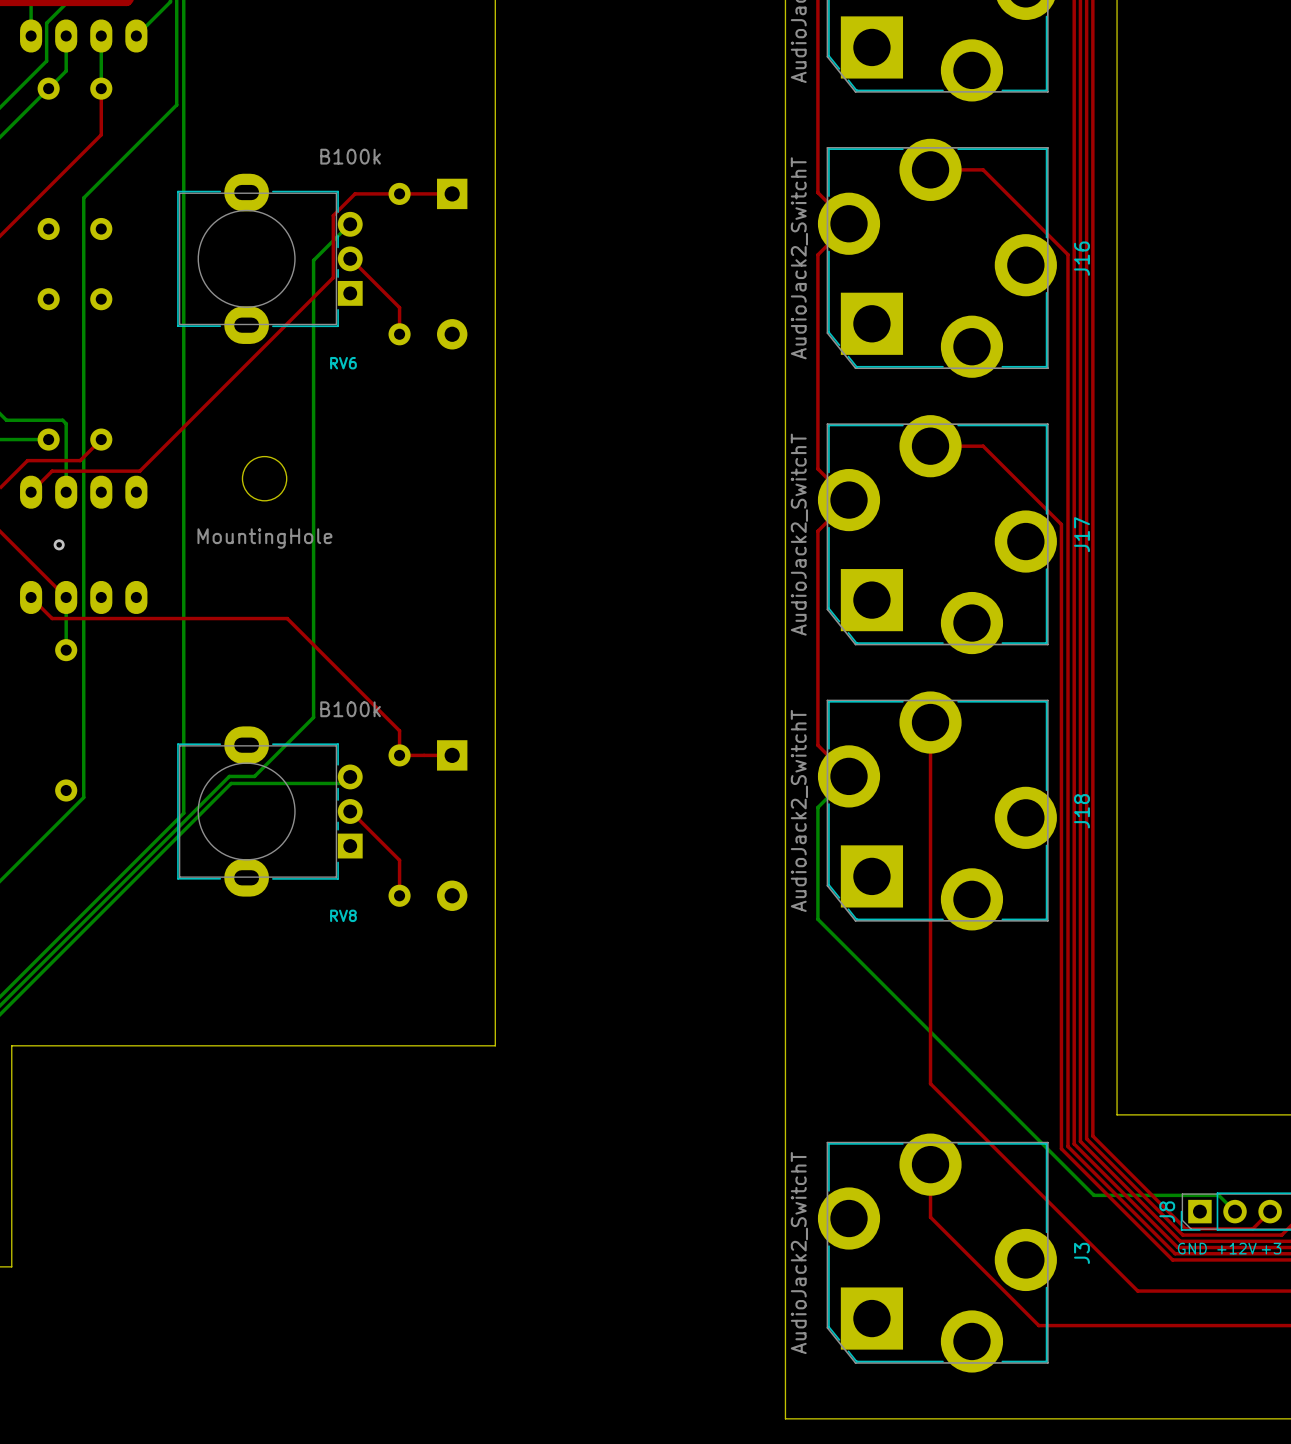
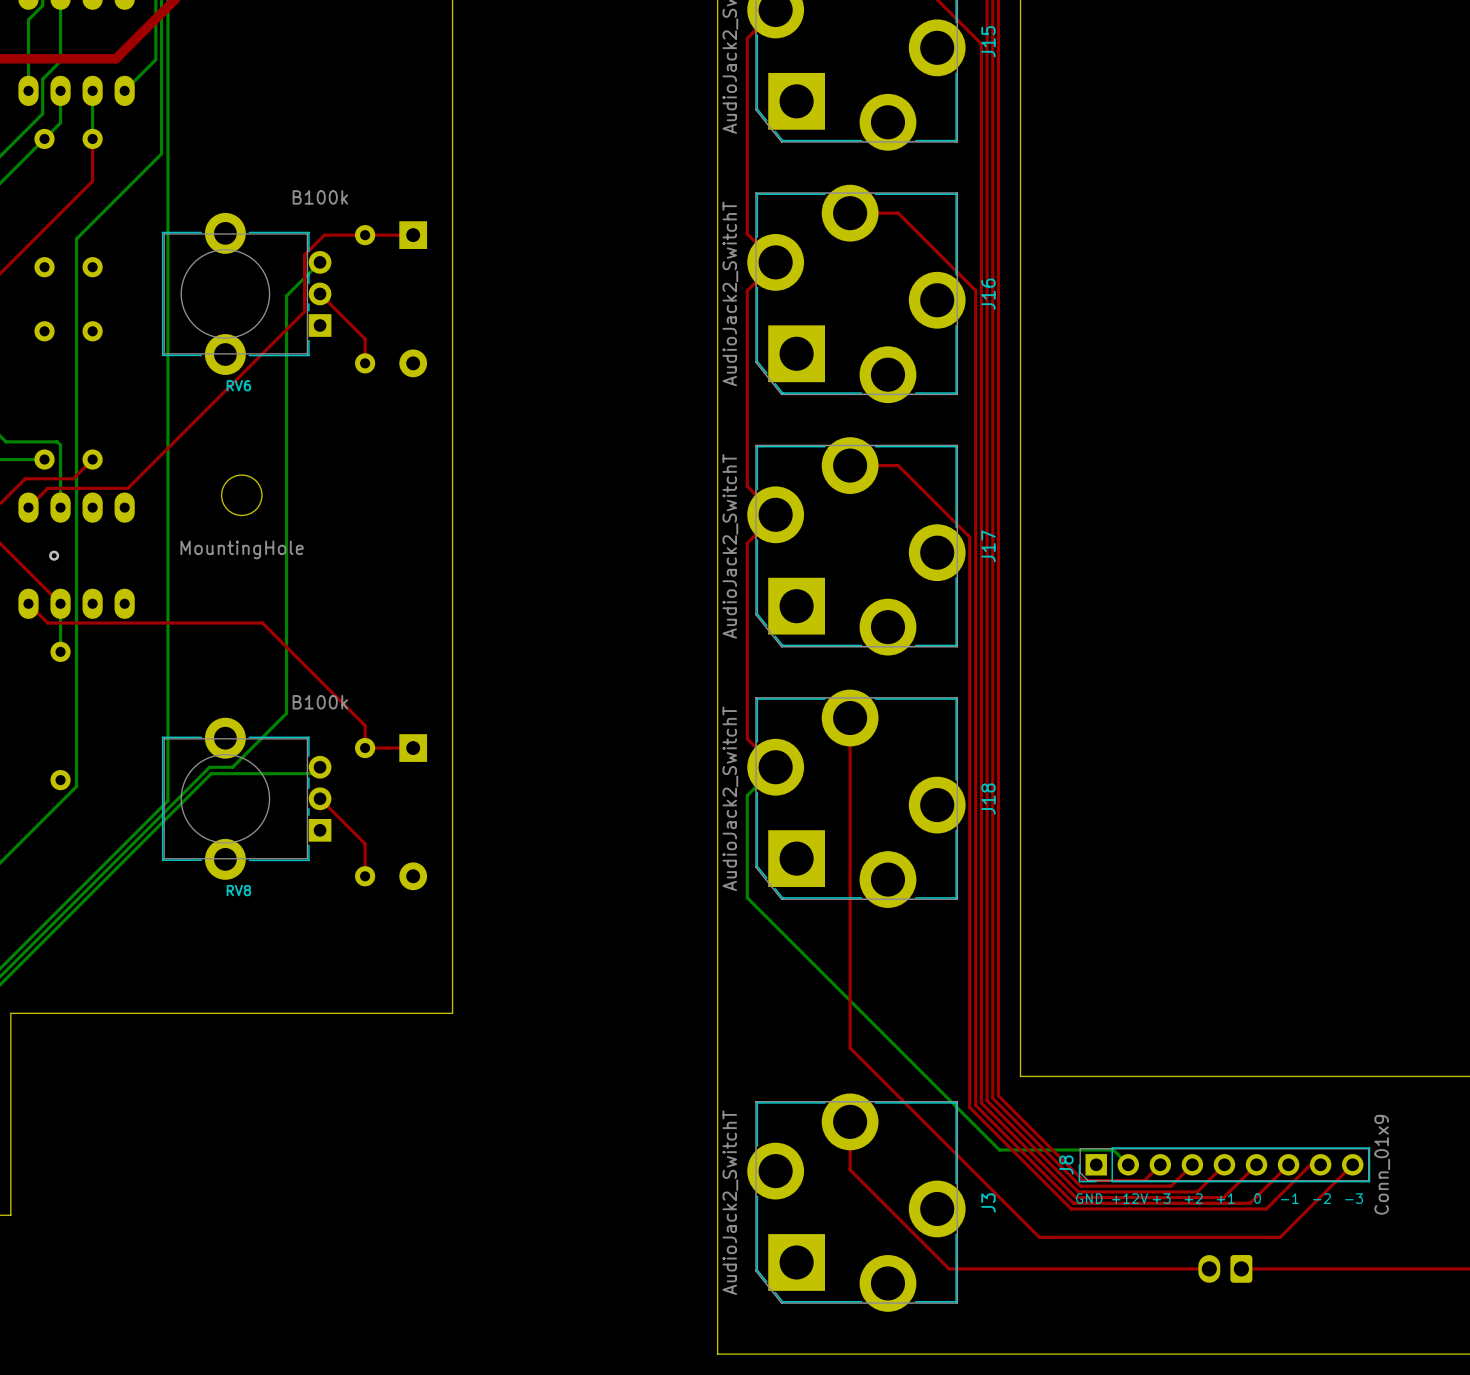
RV6 footprint: [177, 173, 363, 344] -> [161, 212, 332, 375]
RV6 name position: RV6 (343, 363) -> RV6 (238, 385)
RV8 footprint: [177, 726, 363, 897] -> [161, 717, 332, 880]
RV8 name position: RV8 (343, 915) -> RV8 (238, 890)

